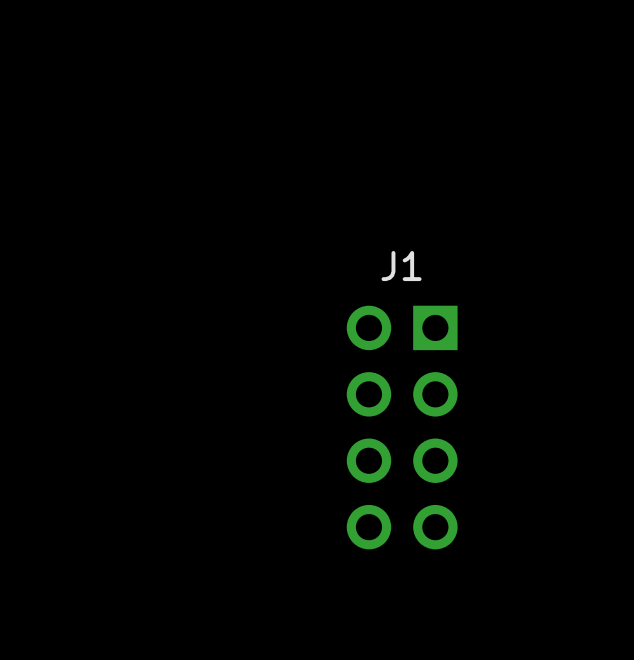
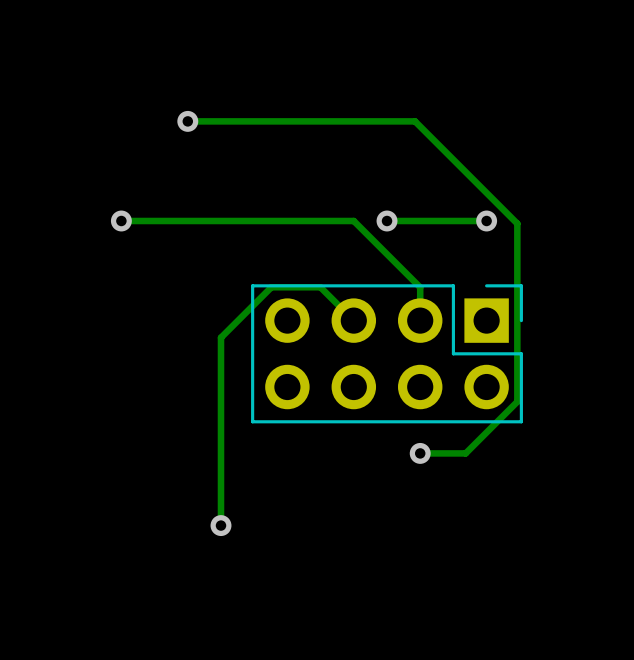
track: none -> (187, 121) (415, 121) (517, 223) (517, 401) (465, 453) (420, 453)
via: none -> (187, 121)
track: none -> (121, 221) (353, 221) (420, 287) (420, 320)
via: none -> (121, 221)
via: none -> (387, 221)
track: none -> (486, 221) (387, 221)
via: none -> (486, 221)
track: none -> (353, 320) (320, 287) (271, 287) (221, 337) (221, 525)
J1 side: top (402, 427) -> bottom (387, 353)
via: none -> (420, 453)
via: none -> (221, 525)

